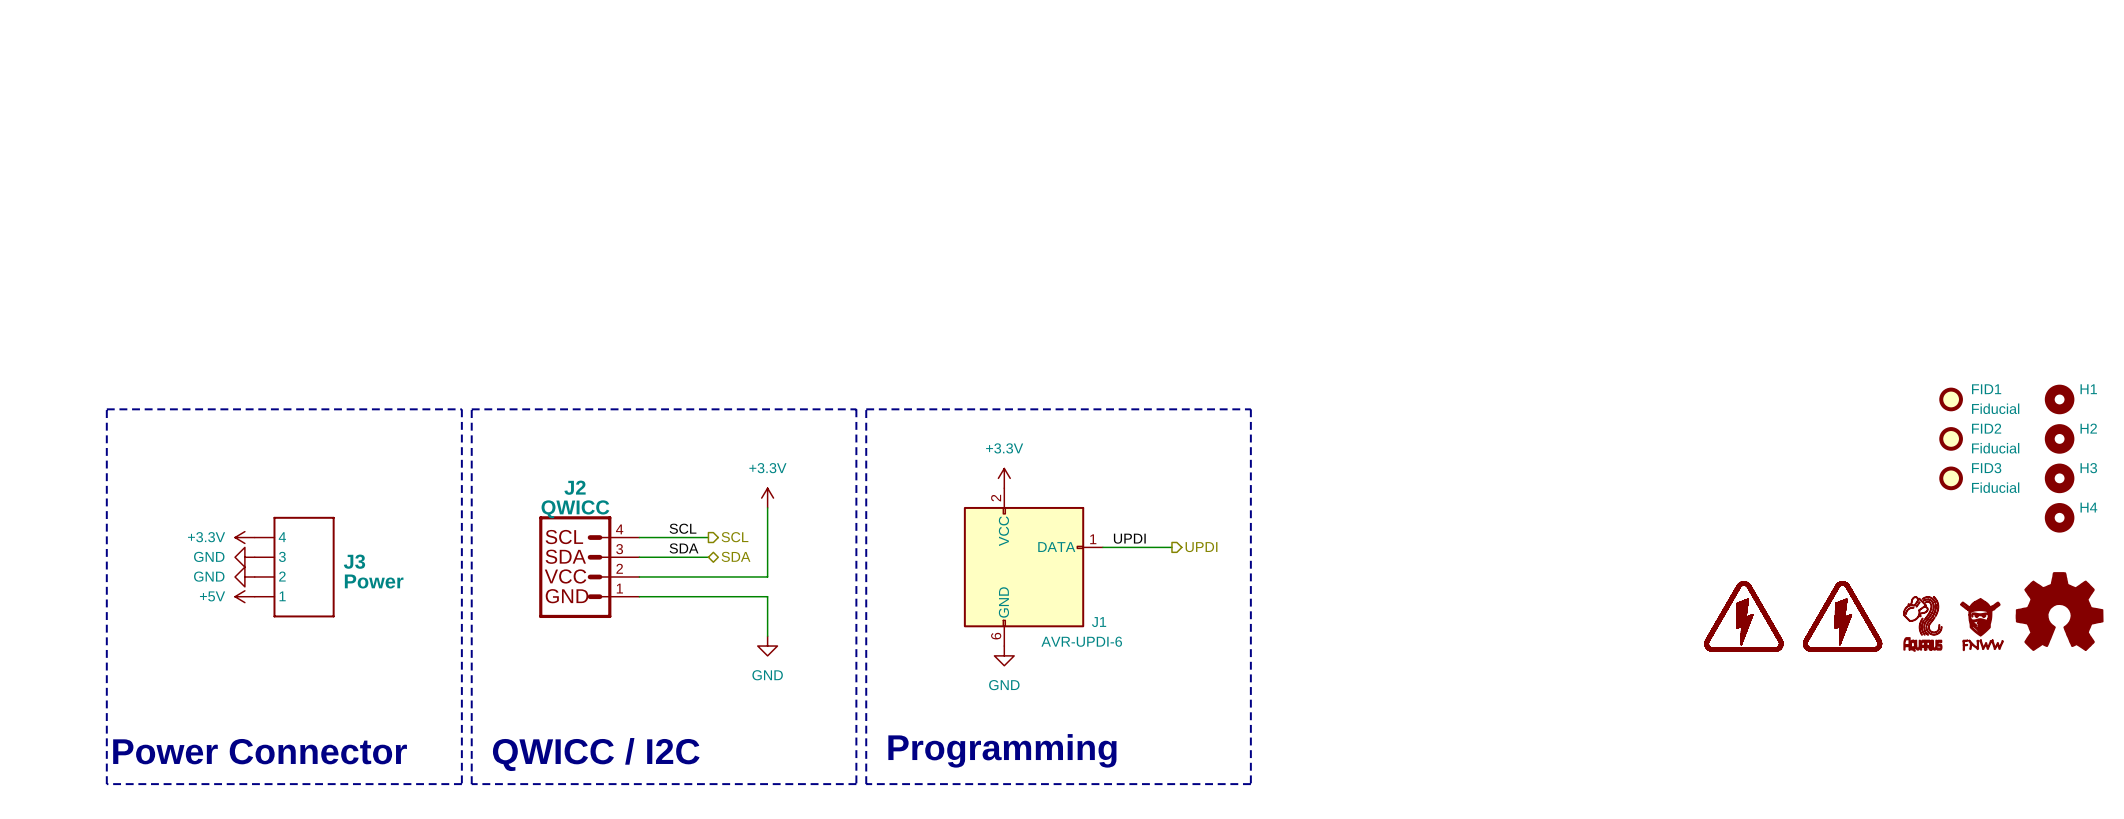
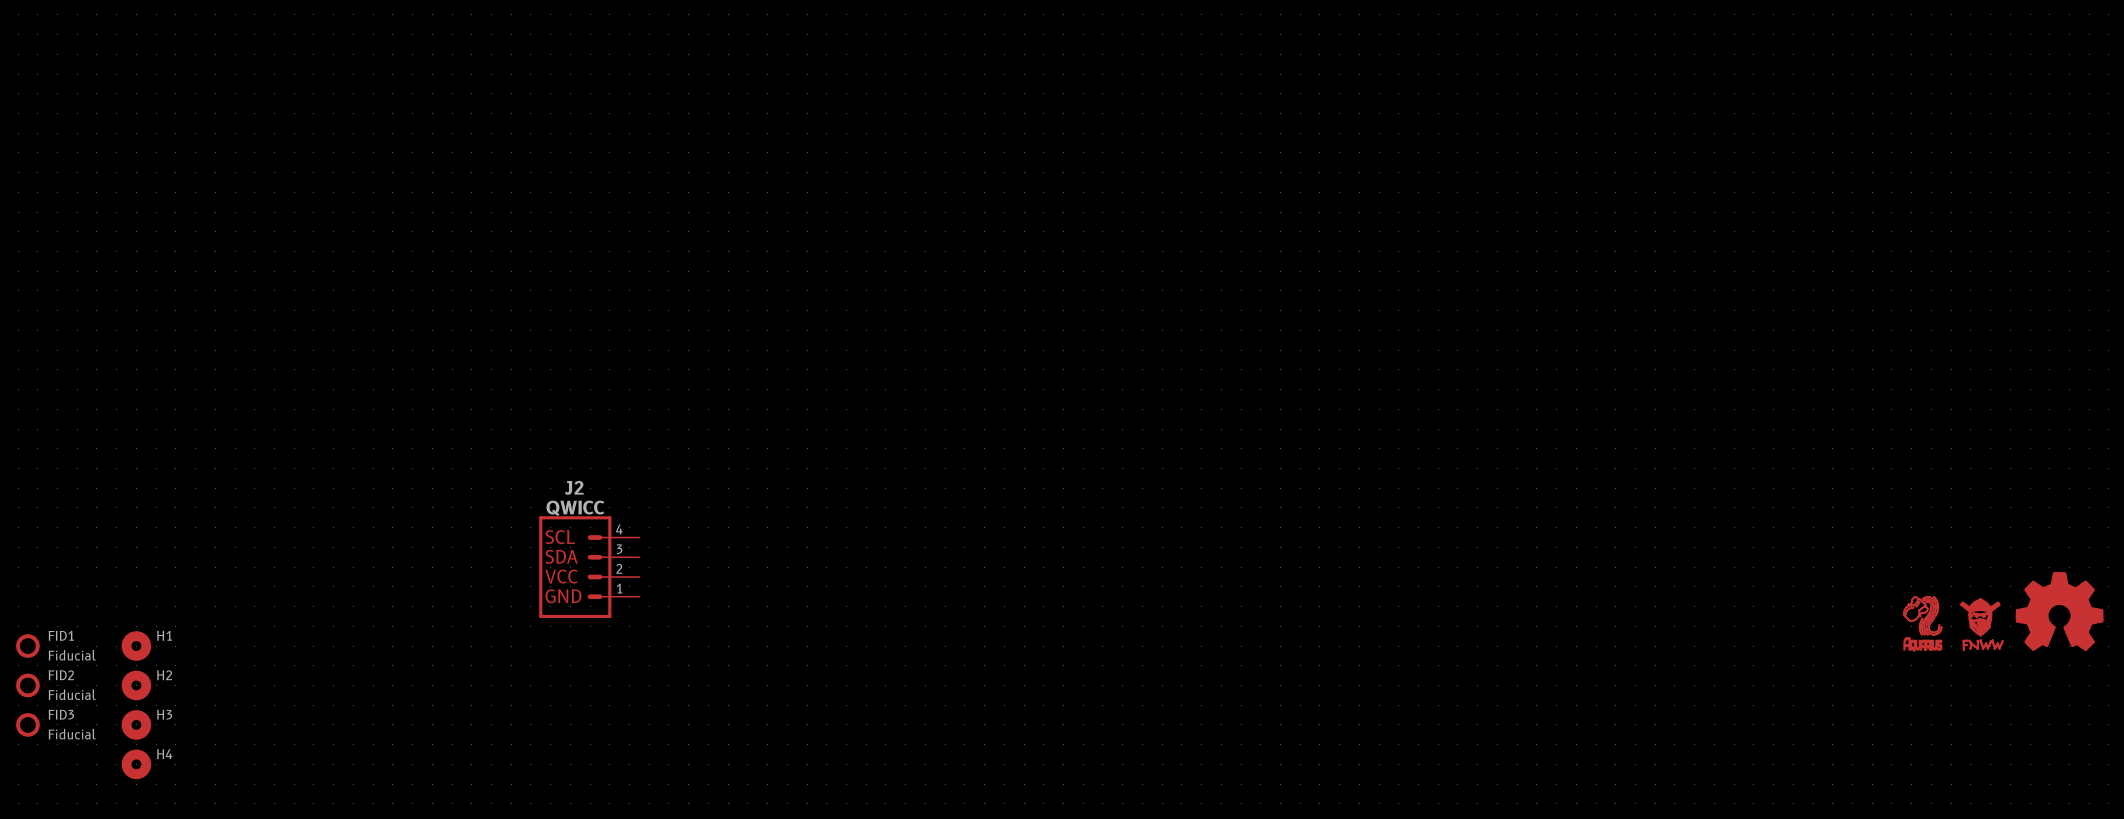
FID1 position: (1951, 399) -> (27, 646)
H1 position: (2059, 399) -> (136, 646)
line: (106, 409) (461, 409) (461, 784) (106, 784) (106, 409) -> none
line: (471, 409) (856, 409) (856, 784) (471, 784) (471, 409) -> none
line: (866, 409) (1250, 409) (1250, 784) (866, 784) (866, 409) -> none
FID2 position: (1951, 438) -> (27, 685)
H2 position: (2059, 438) -> (136, 685)
power symbol: +3.3V (1004, 478) -> none
FID3 position: (1951, 478) -> (27, 724)
H3 position: (2059, 478) -> (136, 724)
power symbol: +3.3V (767, 498) -> none
wire: (767, 507) (767, 576) (639, 576) -> none
H4 position: (2059, 517) -> (136, 764)
label: SCL (683, 528) -> none
power symbol: +3.3V (244, 537) -> none
wire: (639, 537) (708, 537) -> none
hierarchical label: SCL (734, 537) -> none
label: UPDI (1129, 538) -> none
wire: (1102, 547) (1171, 547) -> none
hierarchical label: UPDI (1201, 547) -> none
label: SDA (684, 548) -> none
hierarchical label: SDA (736, 556) -> none
power symbol: GND (244, 557) -> none
wire: (639, 557) (708, 557) -> none
J3: Power (294, 567) -> none
J1: AVR-UPDI-6 (1033, 567) -> none
power symbol: GND (244, 576) -> none
power symbol: +5V (244, 596) -> none
wire: (639, 596) (767, 596) (767, 636) -> none
part: (1743, 616) -> none
part: (1842, 616) -> none
power symbol: GND (767, 646) -> none
power symbol: GND (1004, 655) -> none
text: Programming (1002, 750) -> none
text: Power Connector (260, 751) -> none
text: QWICC / I2C (596, 754) -> none

